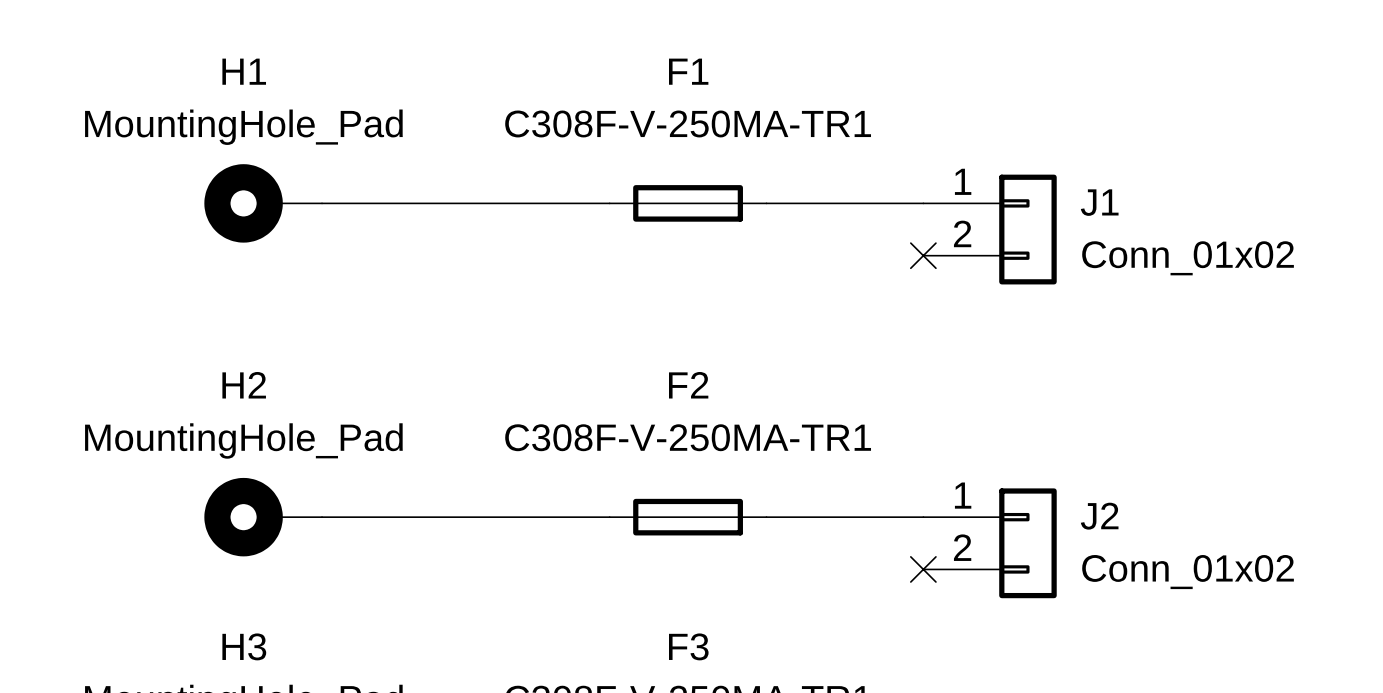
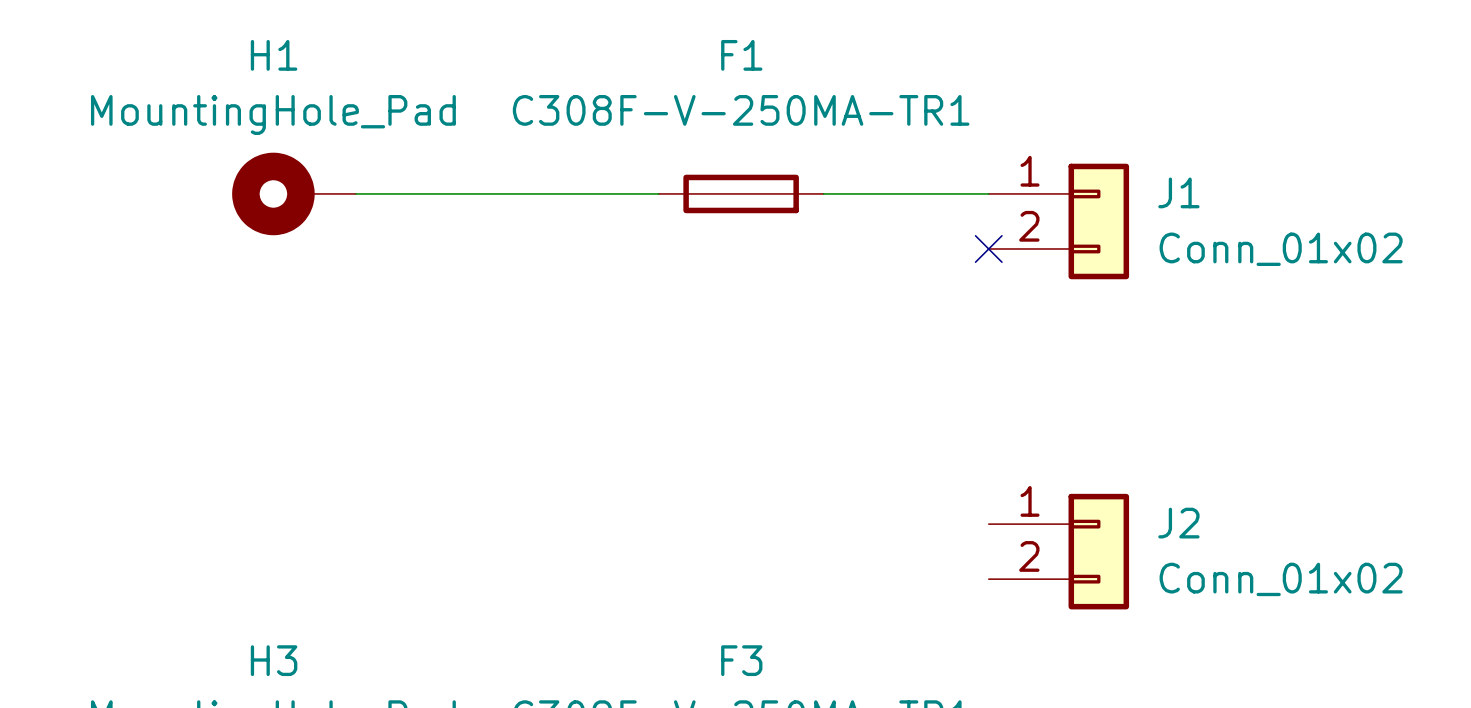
H2: MountingHole_Pad (263, 517) -> none
wire: (322, 517) (609, 517) -> none
F2: C308F-V-250MA-TR1 (688, 517) -> none
wire: (766, 517) (923, 517) -> none
no-connect mark: (923, 569) -> none

